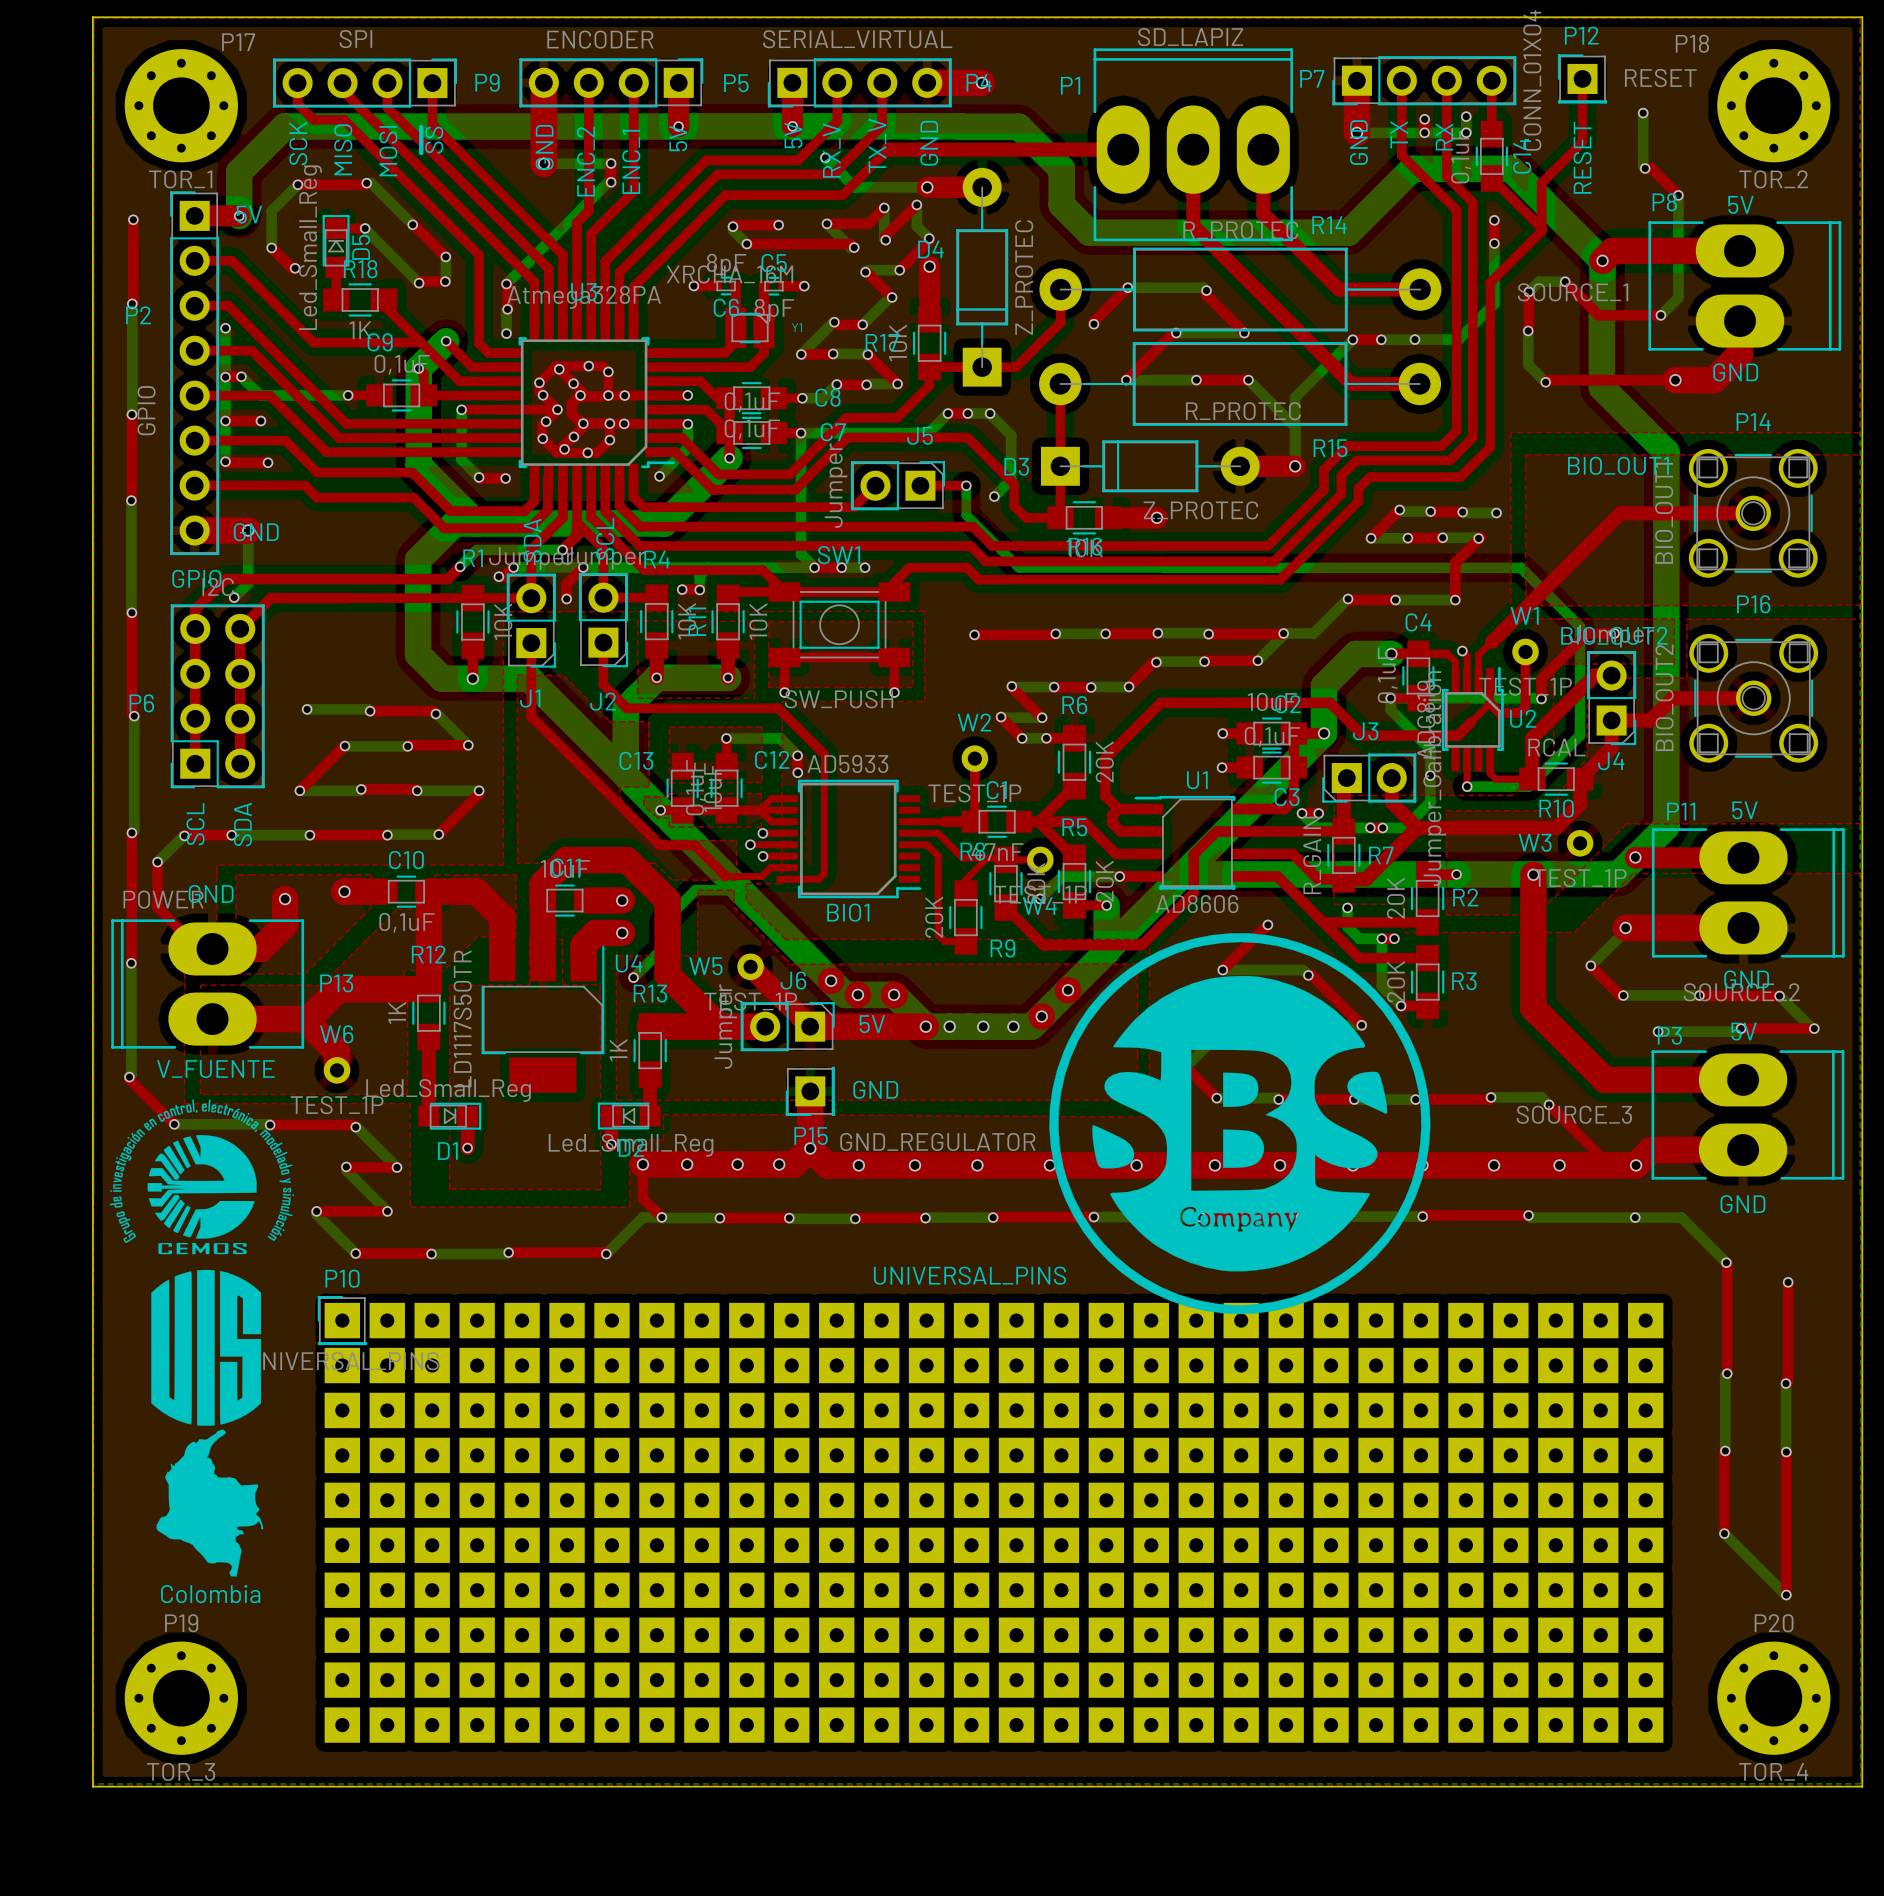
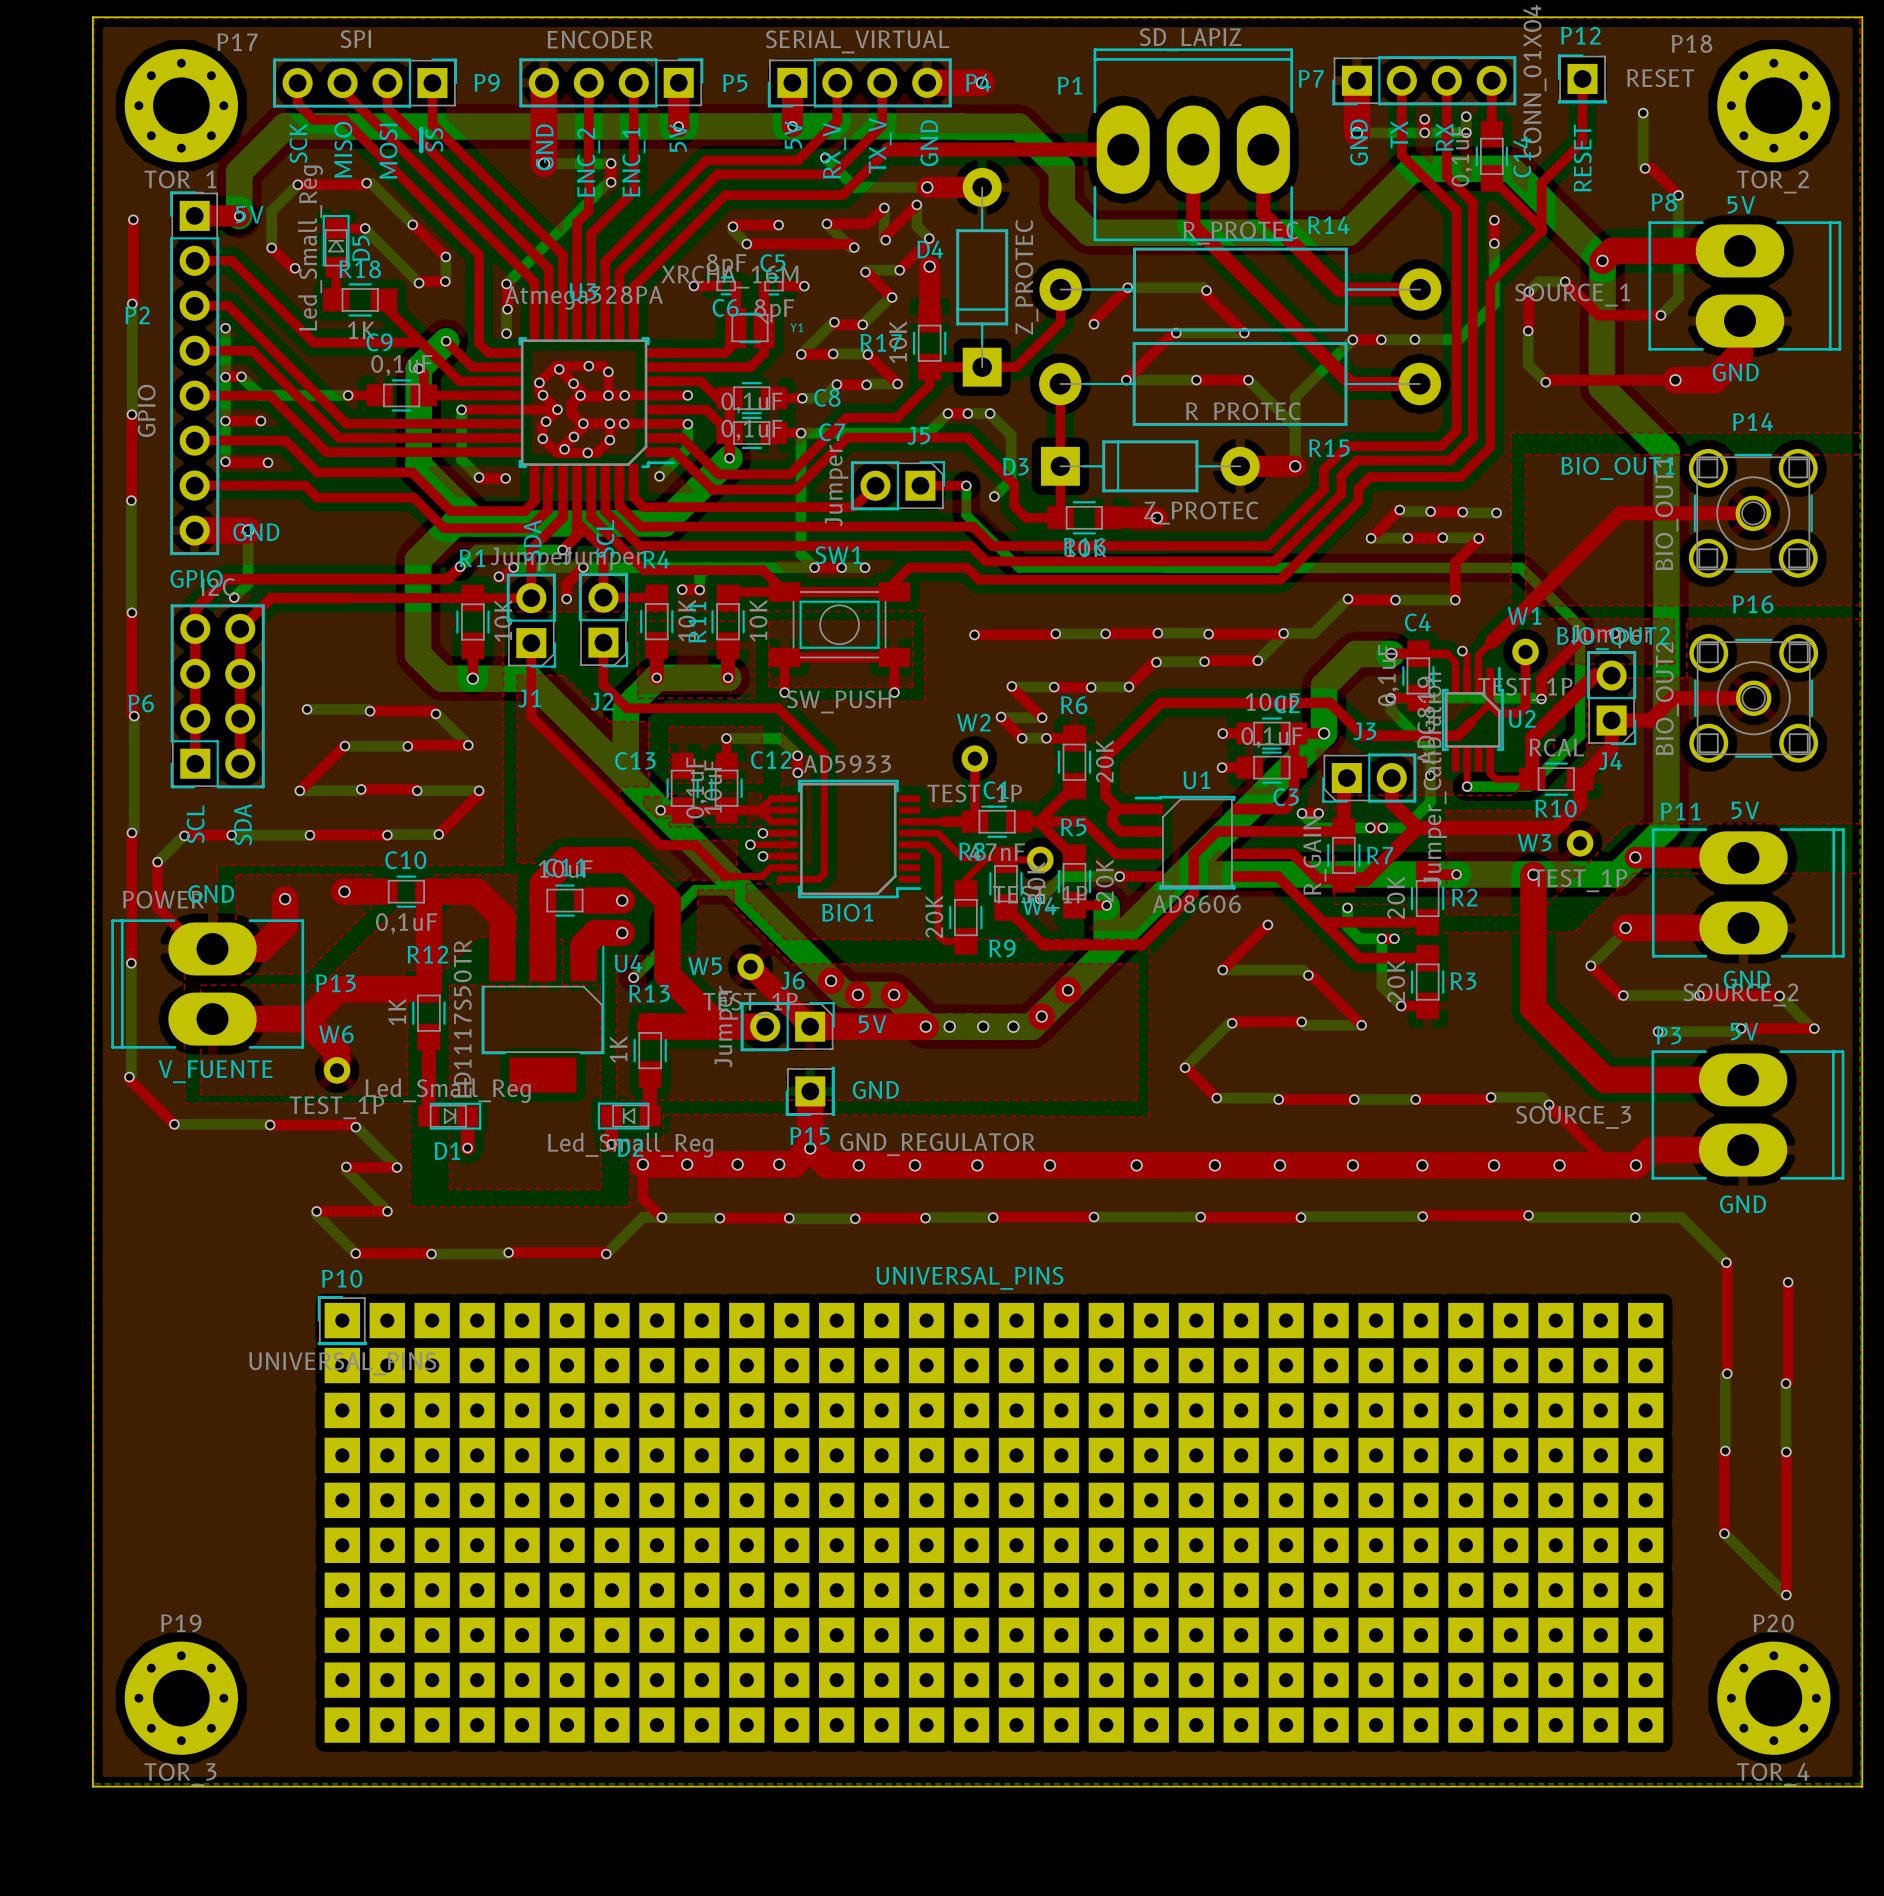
drawing: [1049, 933, 1431, 1315] -> none
drawing: [109, 1099, 295, 1577] -> none
text: Colombia (210, 1594) -> none

